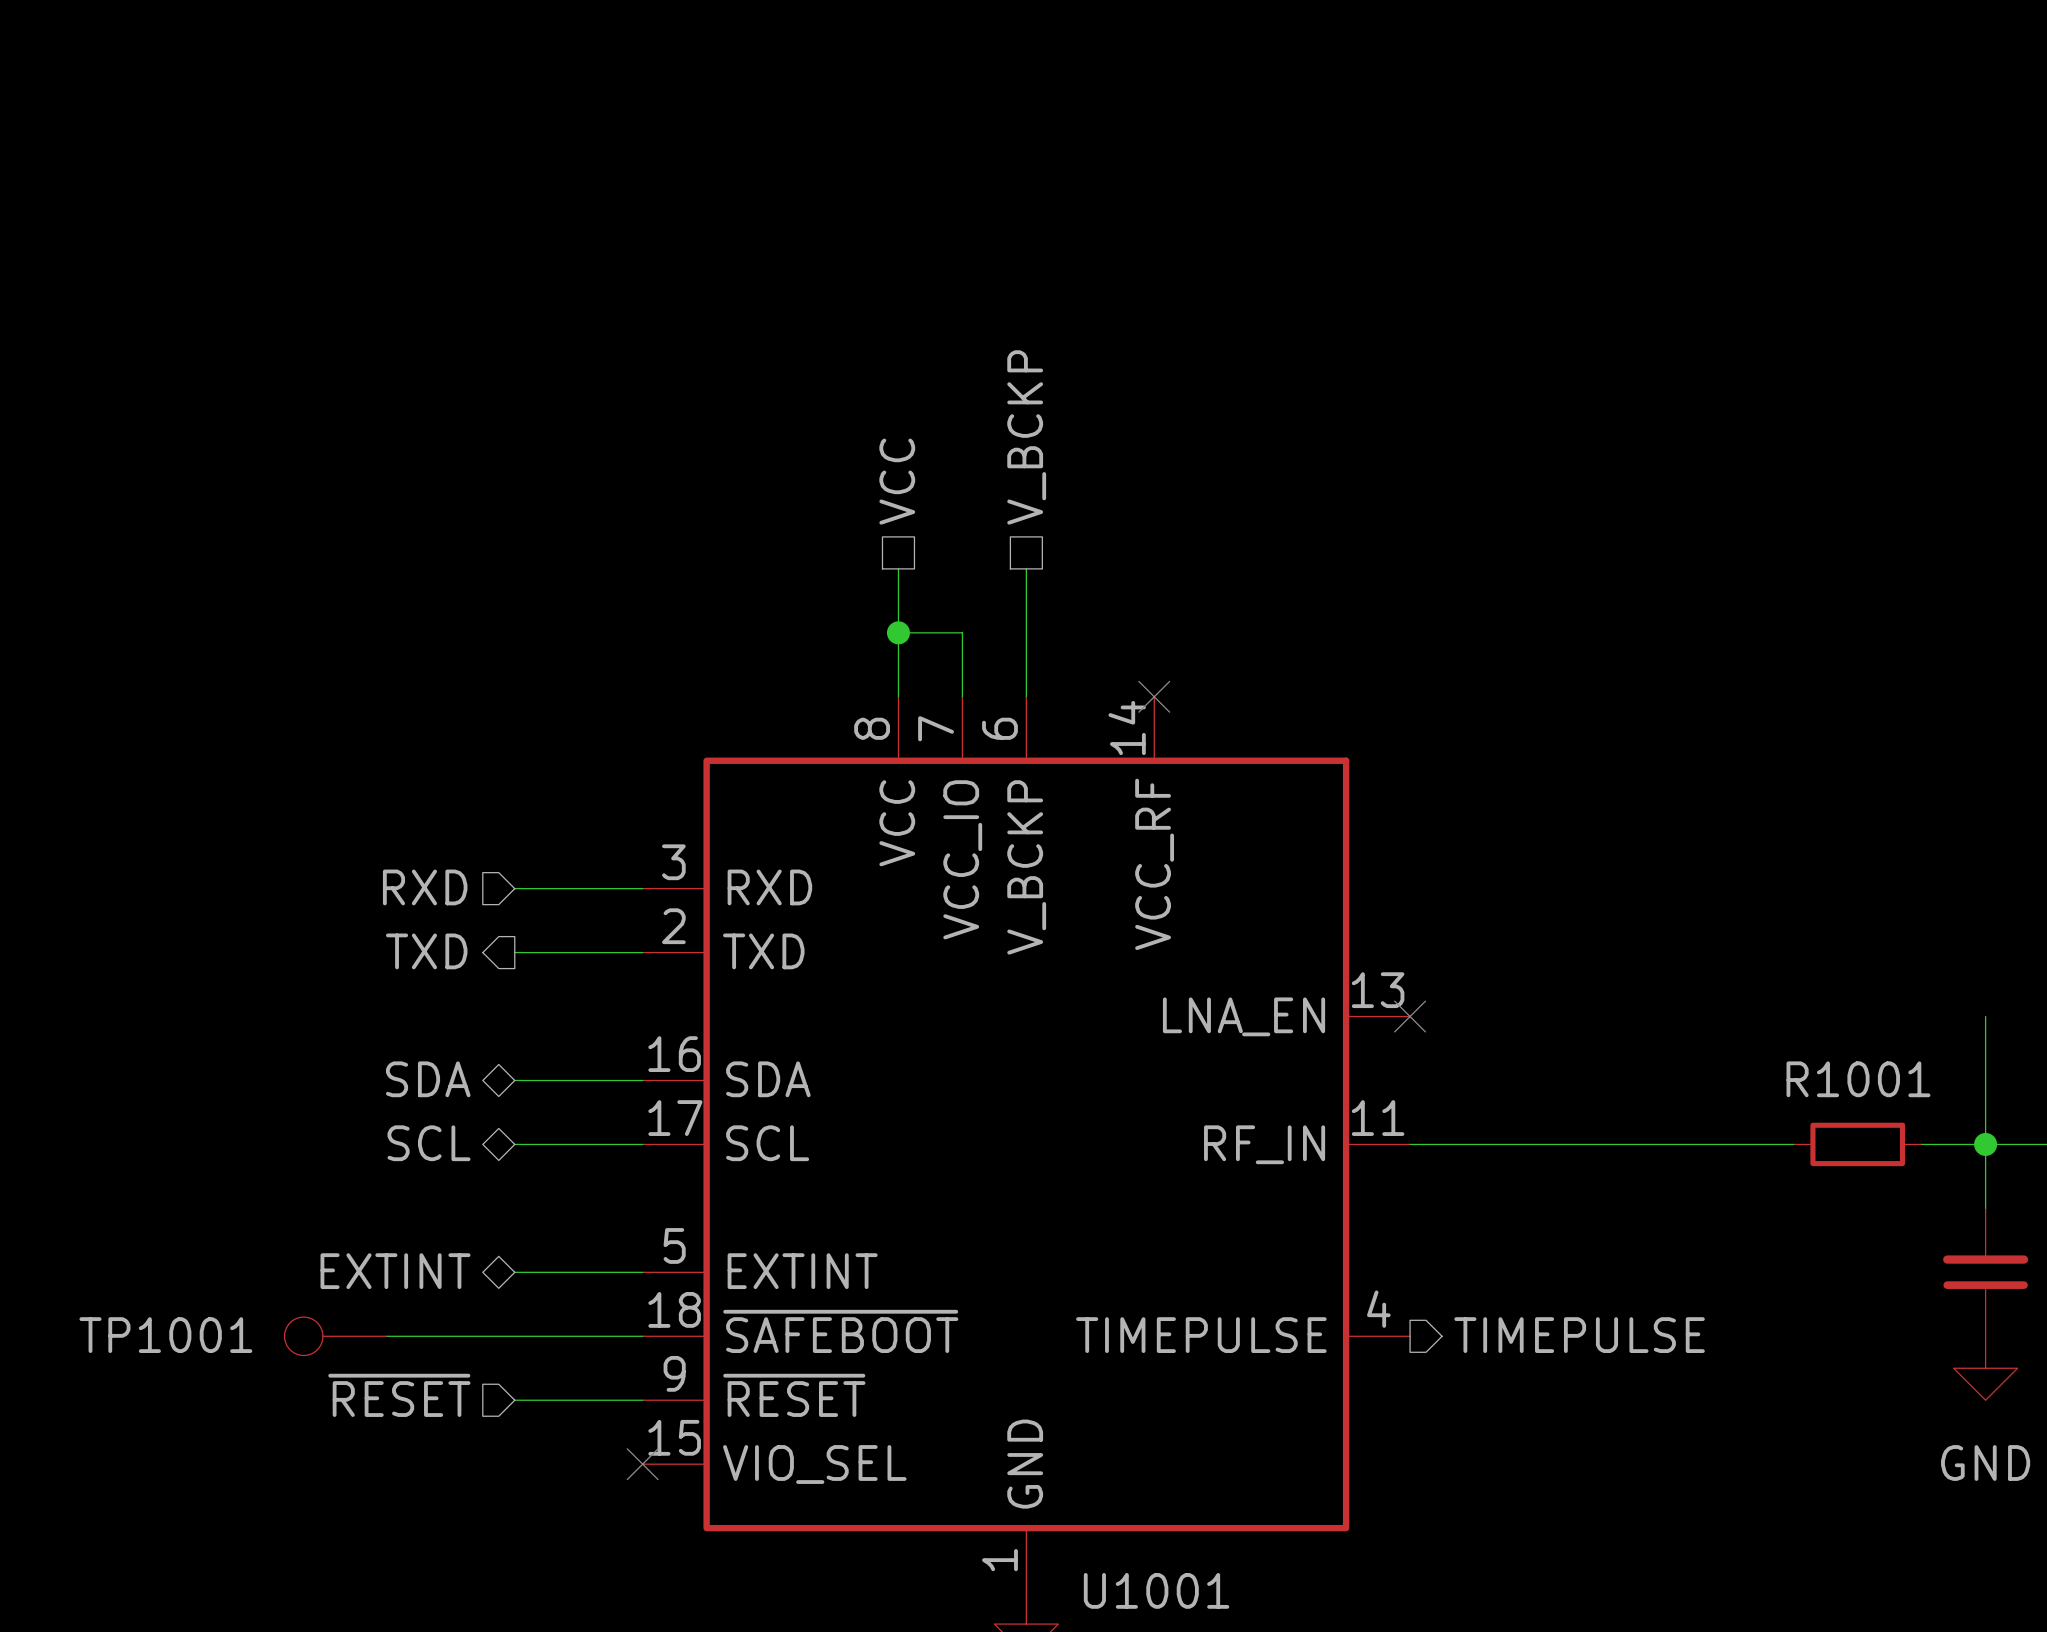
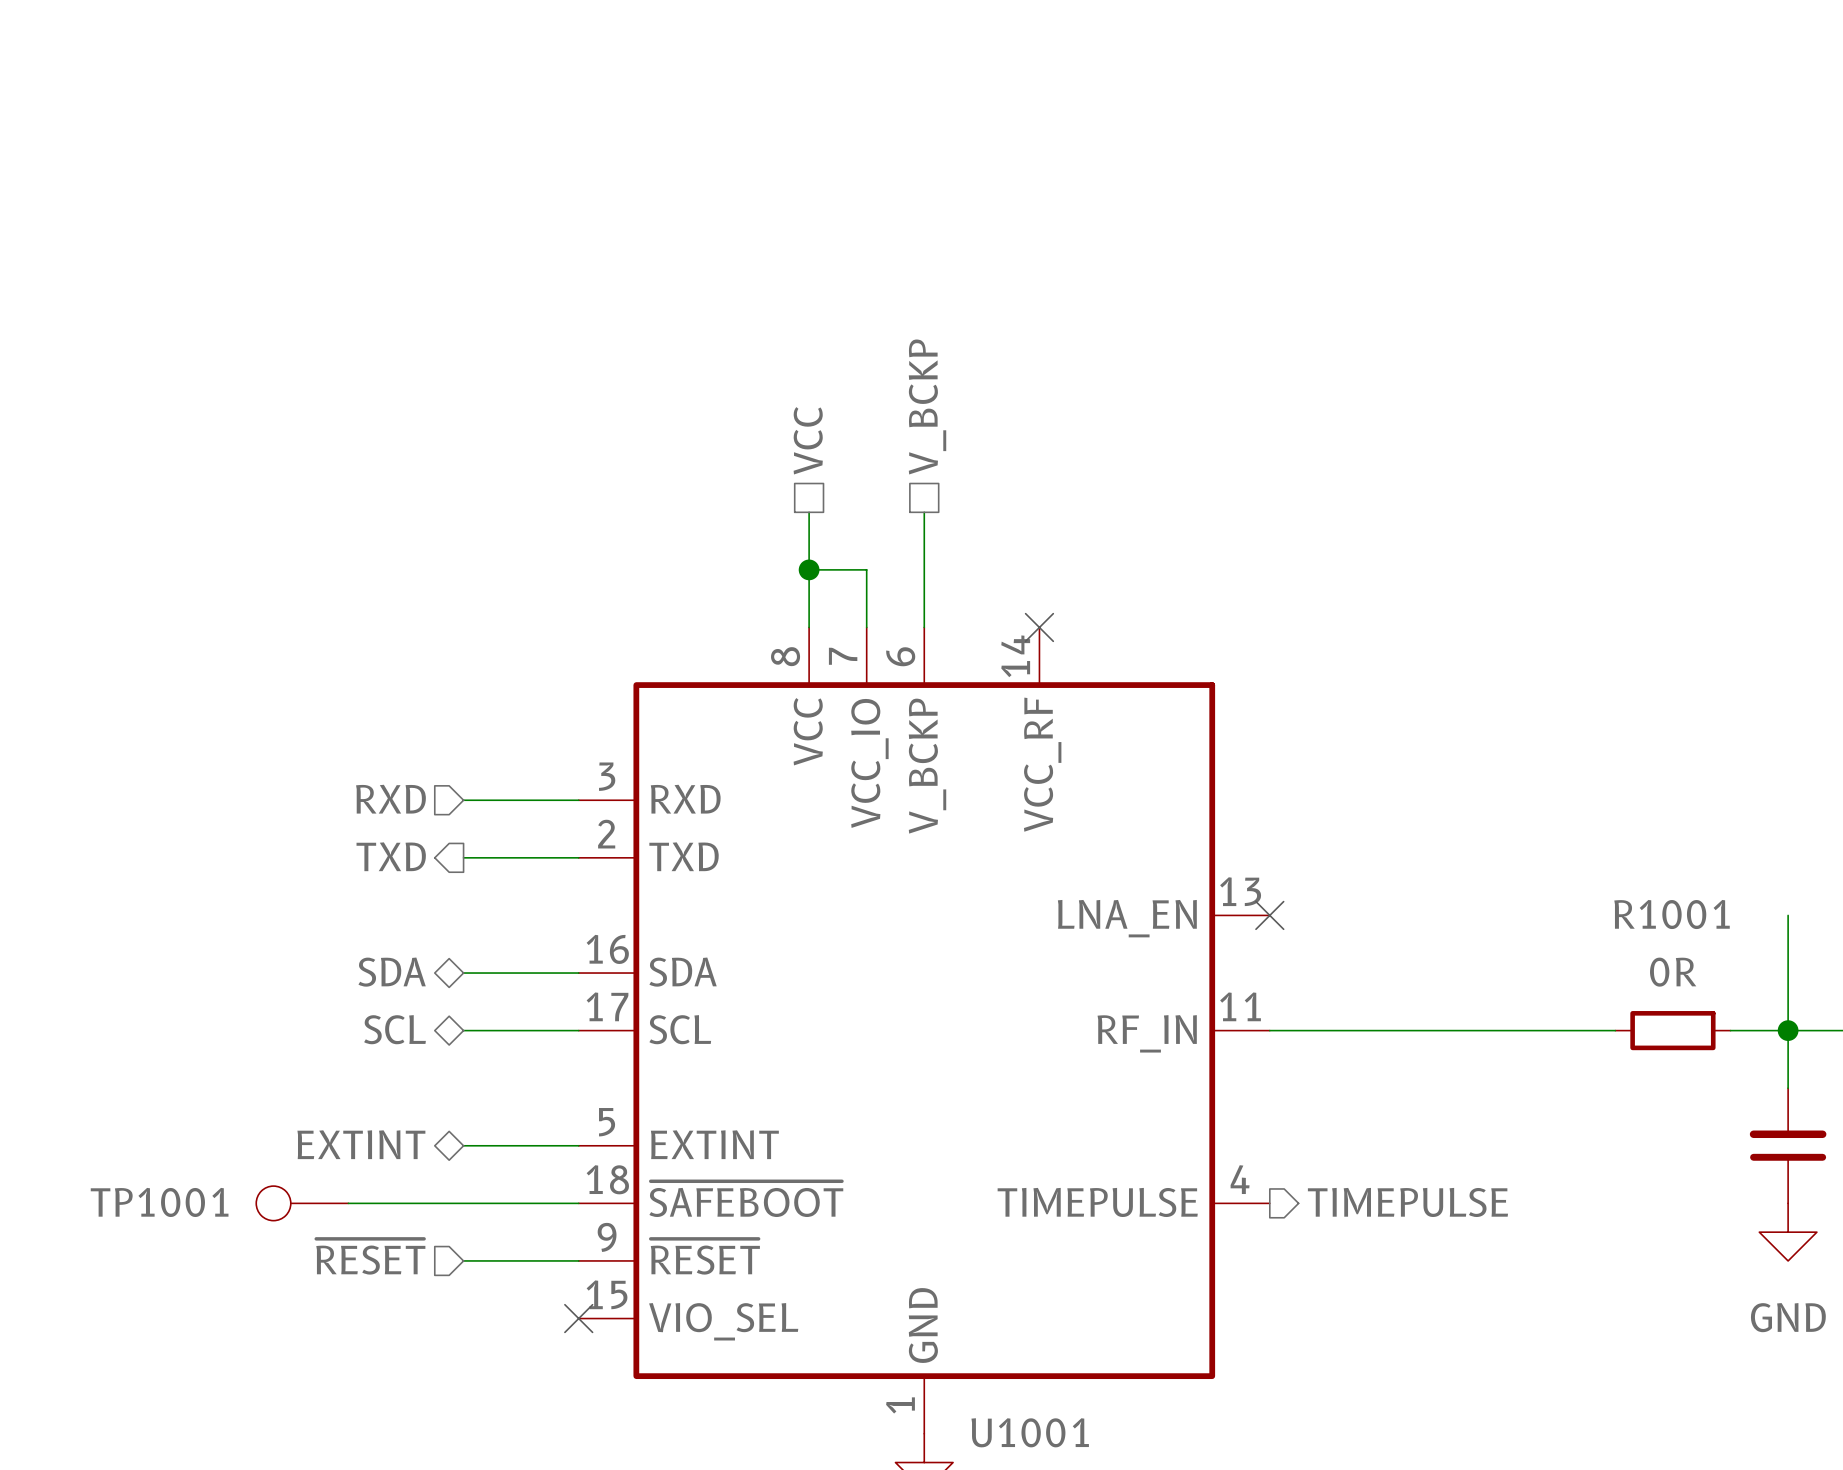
R1001 value: none -> 0R (1673, 972)
R1001 name position: R1001 (1858, 1079) -> R1001 (1672, 914)

